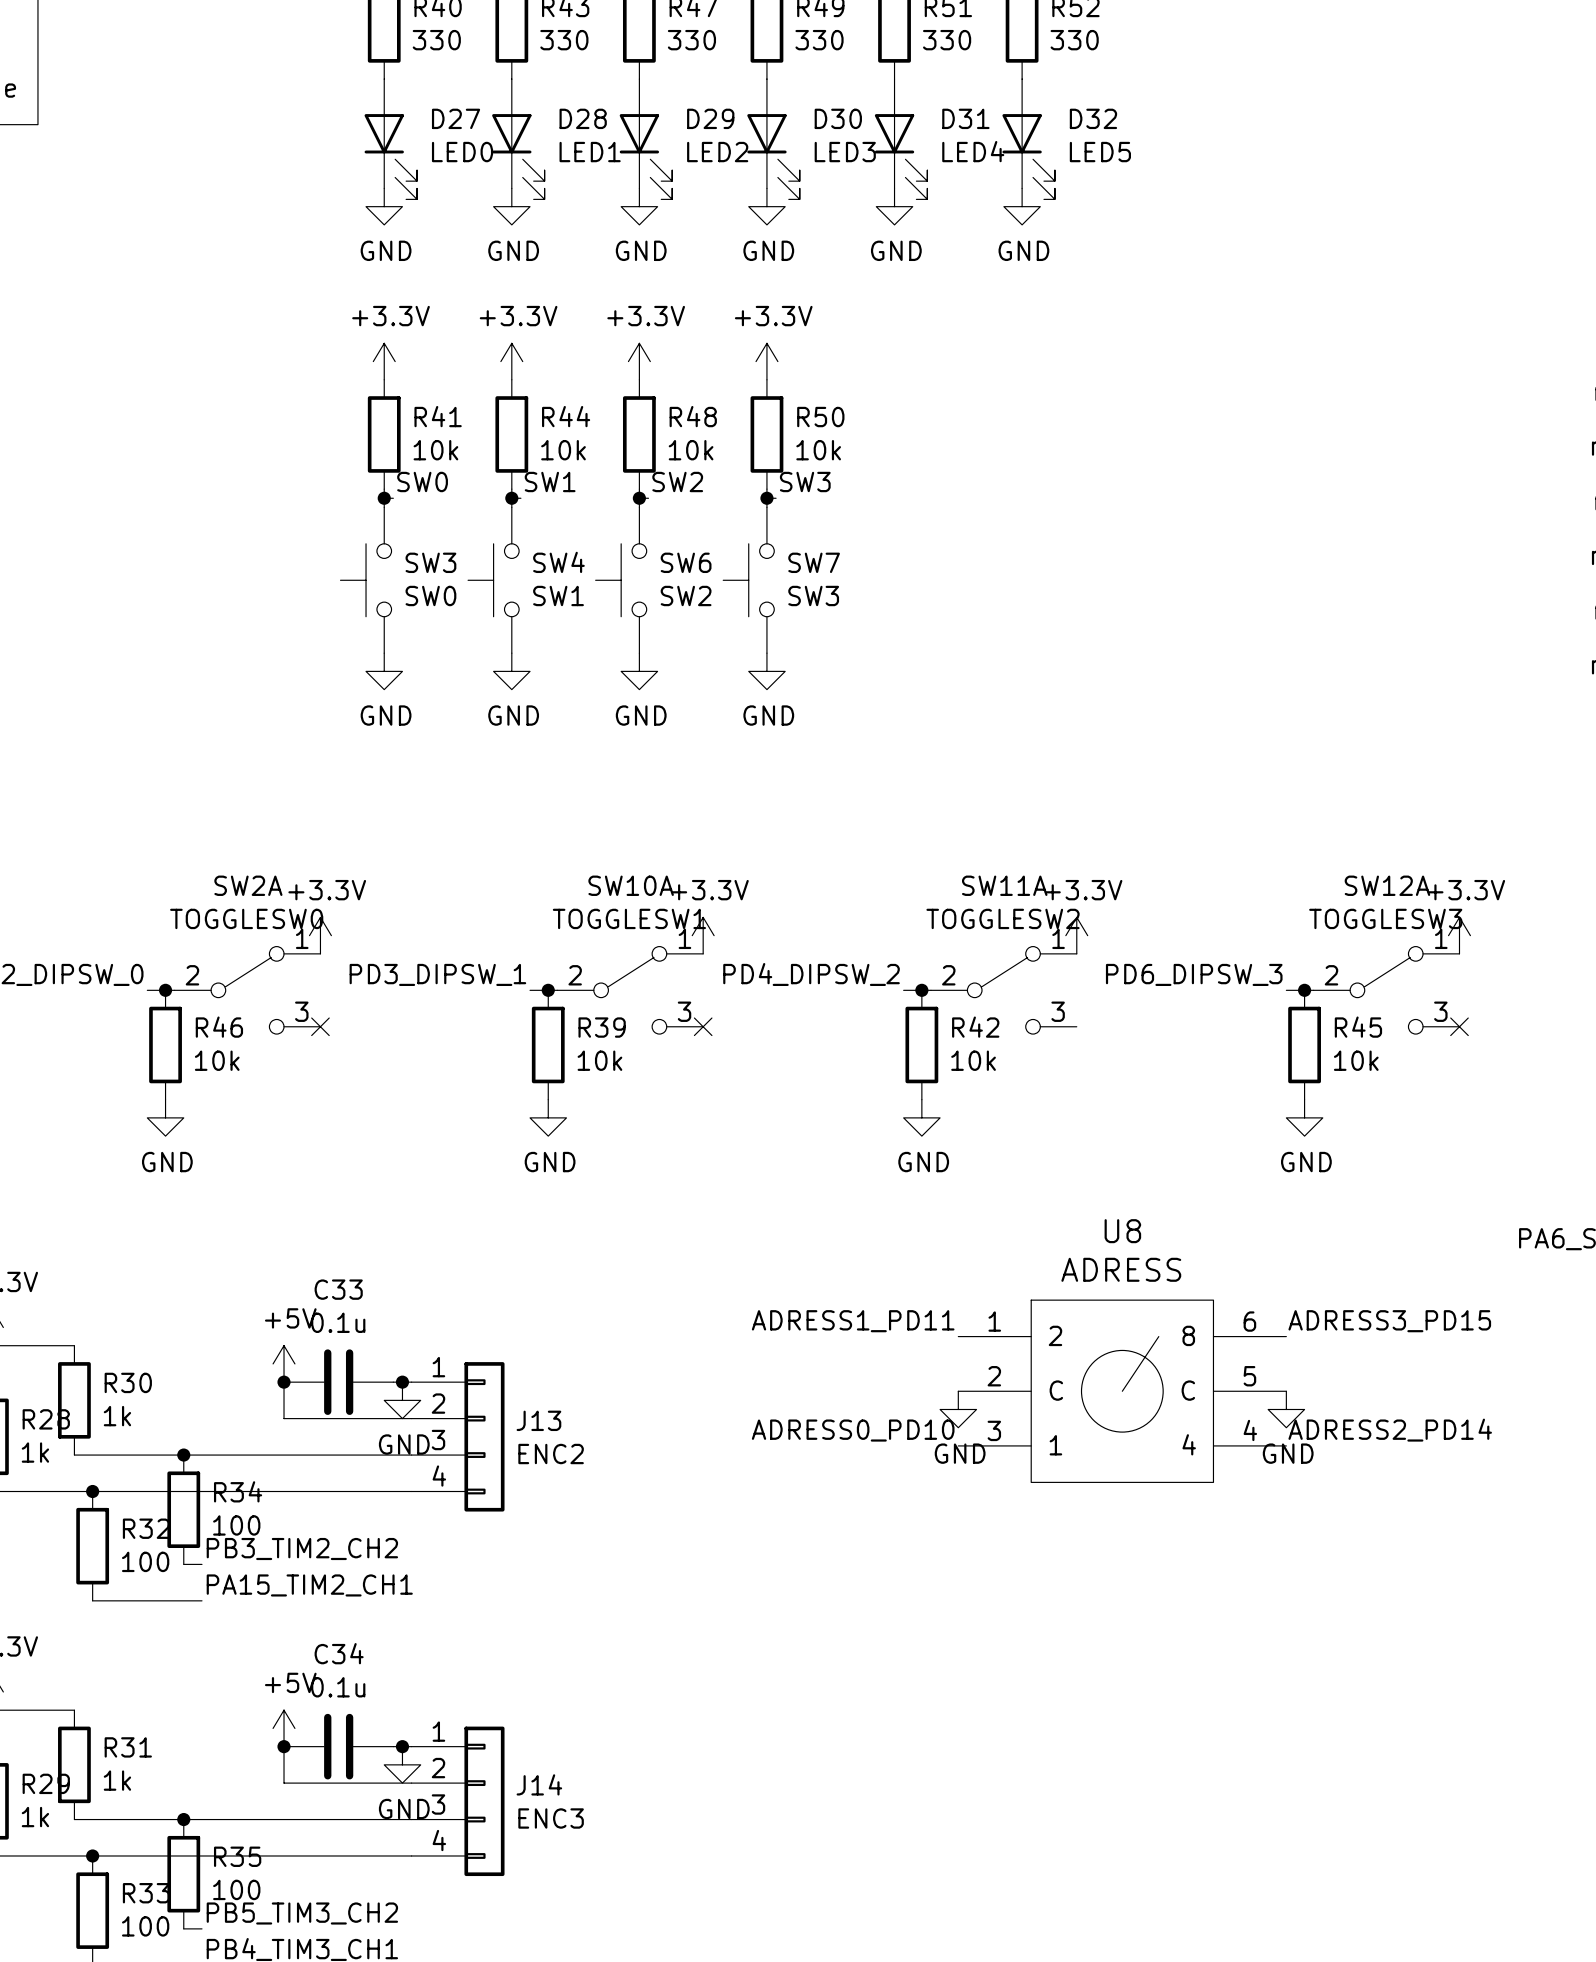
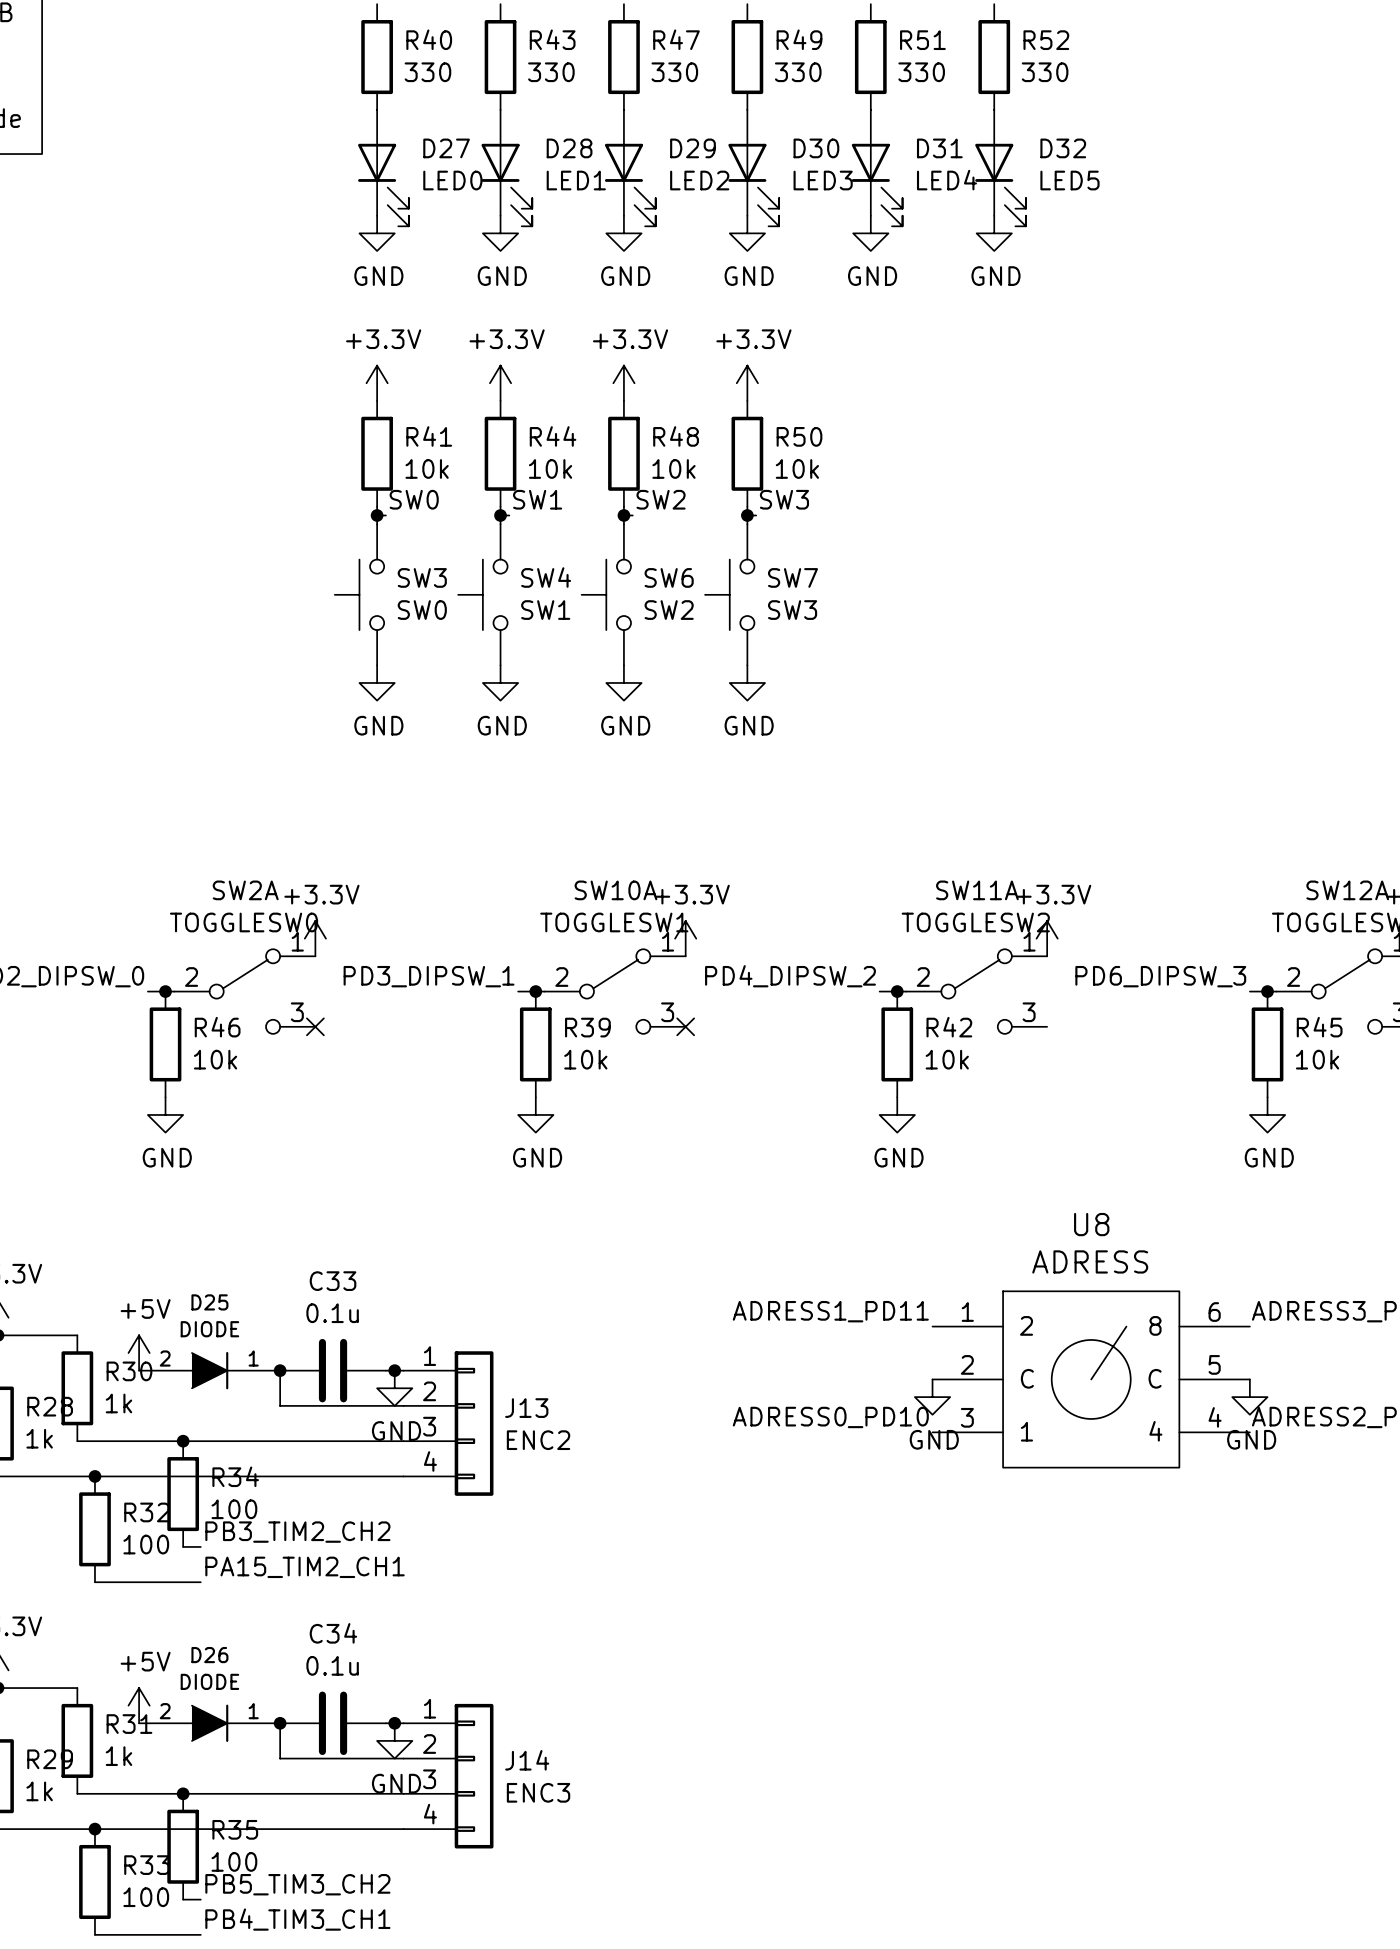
power symbol position: +5V (284, 1363) -> +5V (139, 1353)
D25: none -> DIODE (209, 1370)
power symbol position: +5V (284, 1728) -> +5V (139, 1705)
D26: none -> DIODE (209, 1723)

